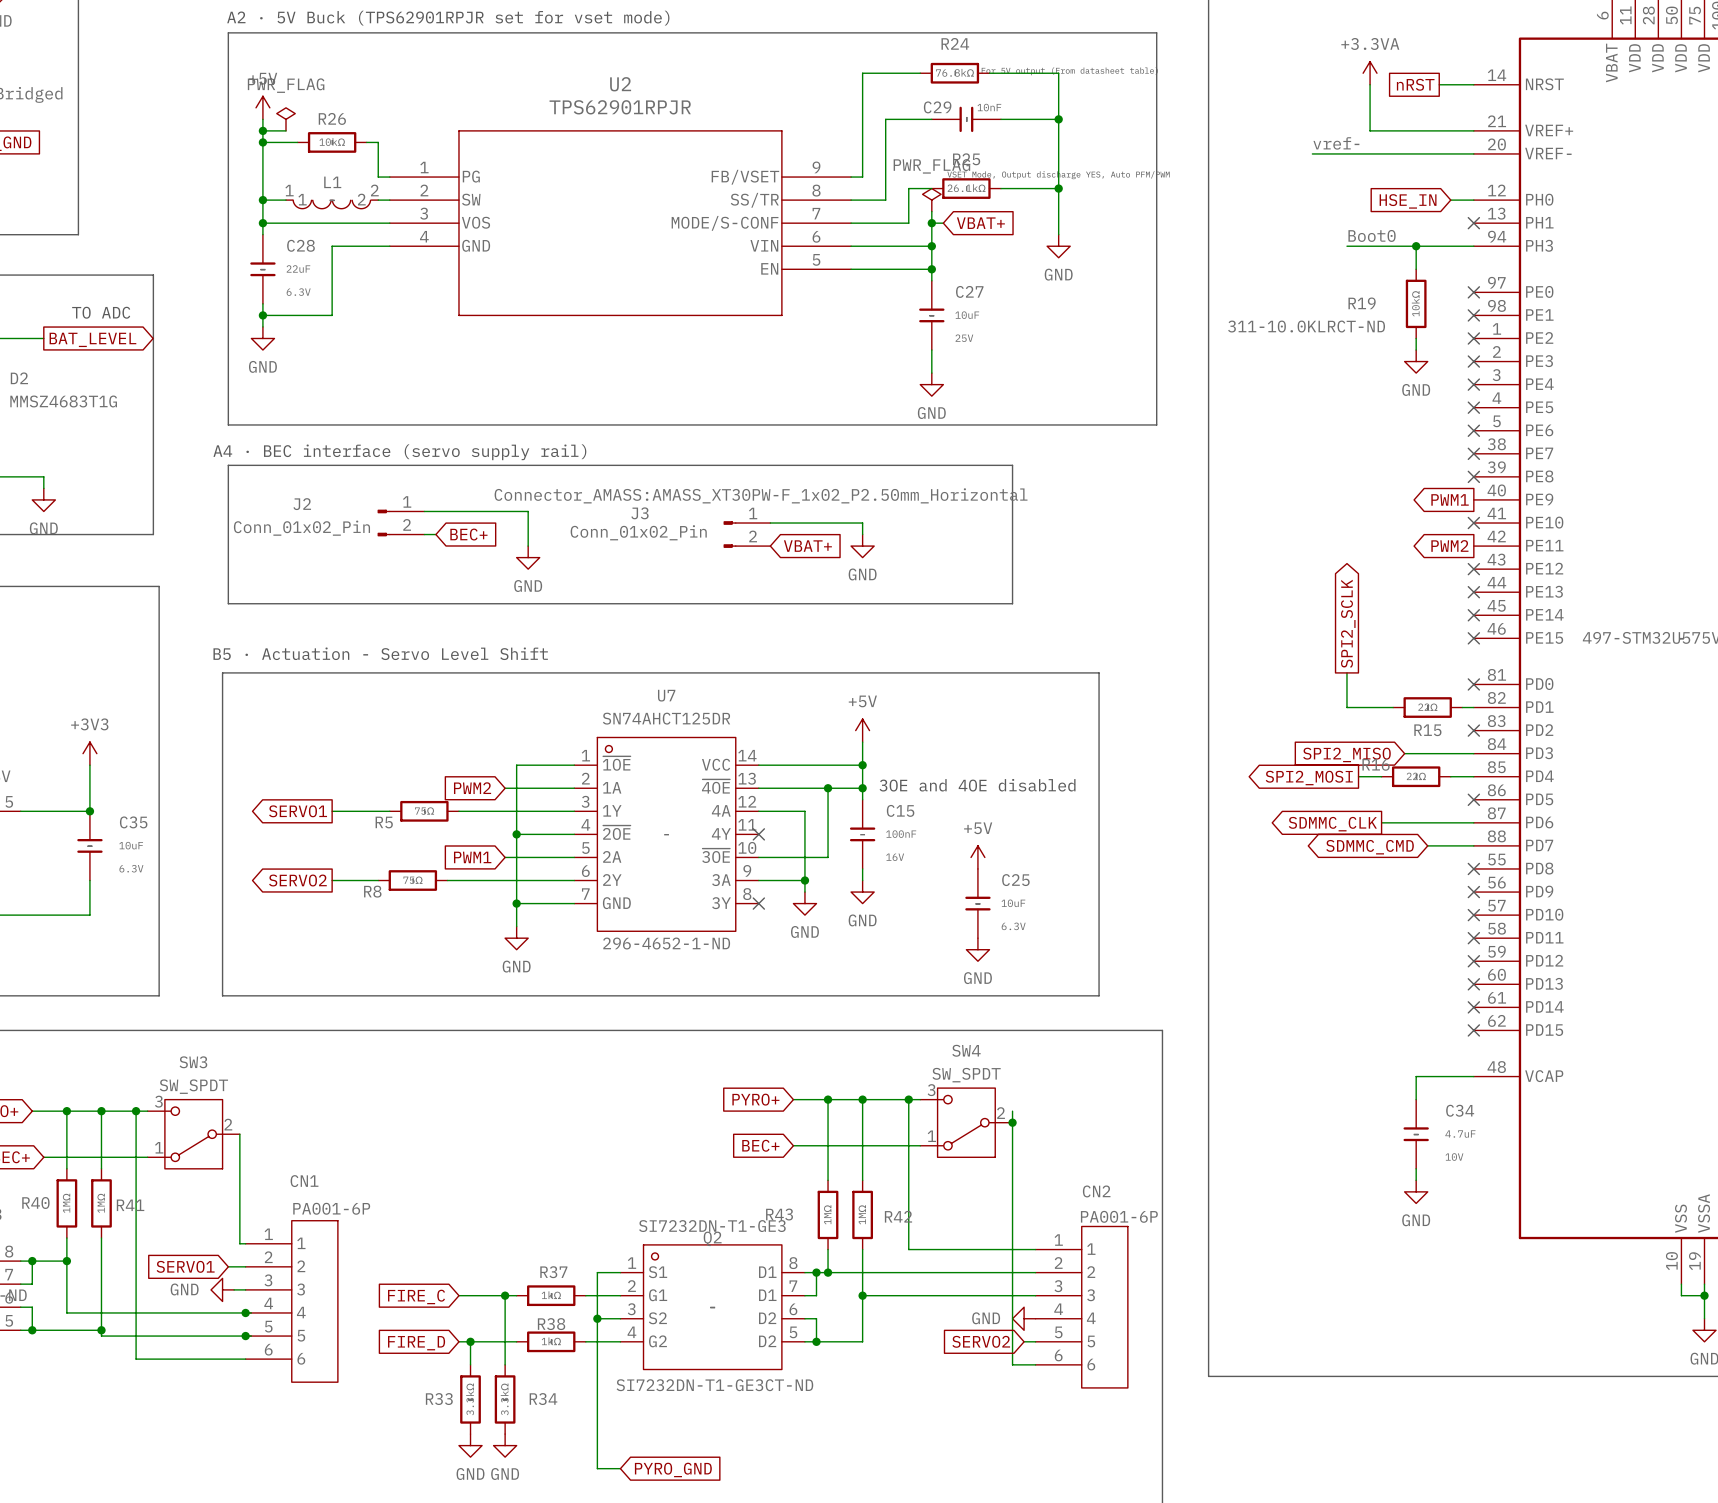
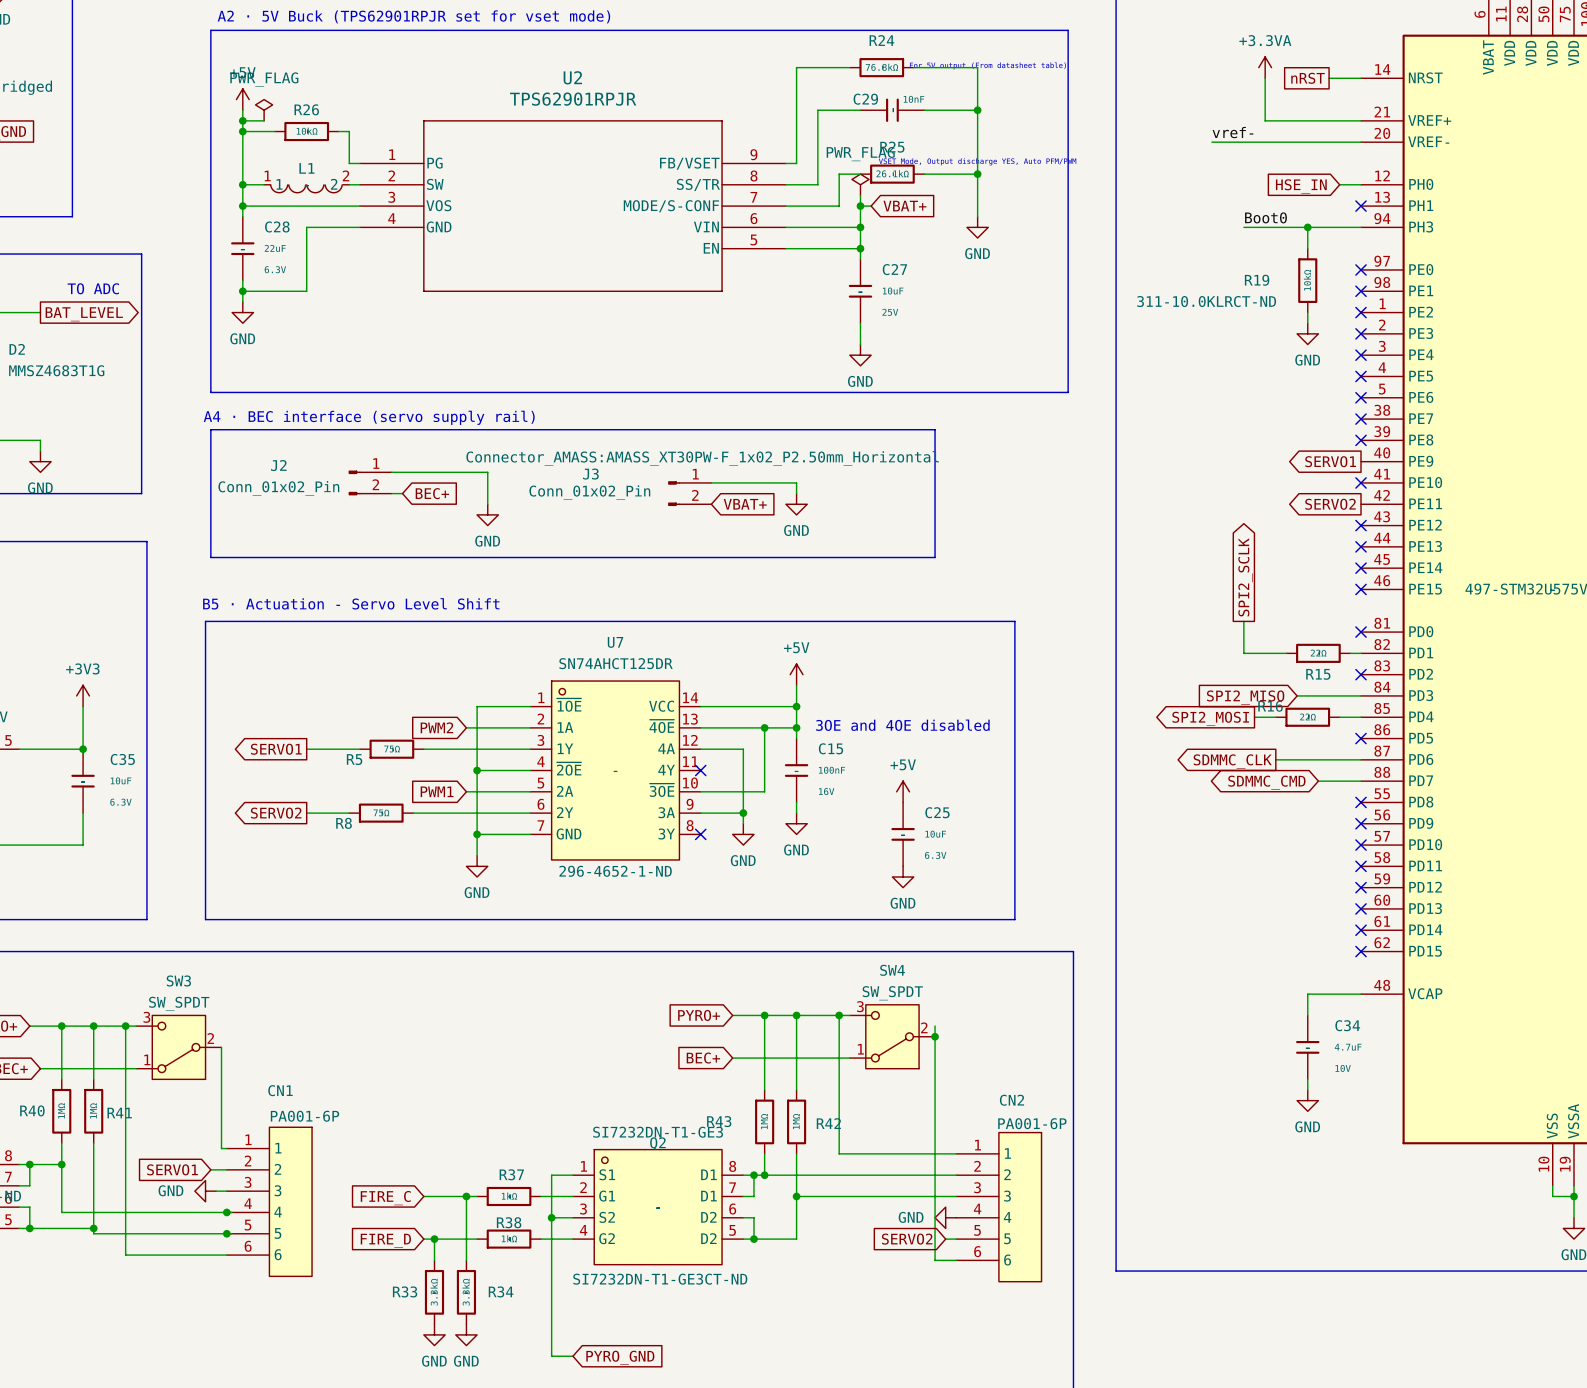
global label: PWM1 (1450, 499) -> SERVO1 (1330, 461)
global label: PWM2 (1449, 545) -> SERVO2 (1330, 504)

